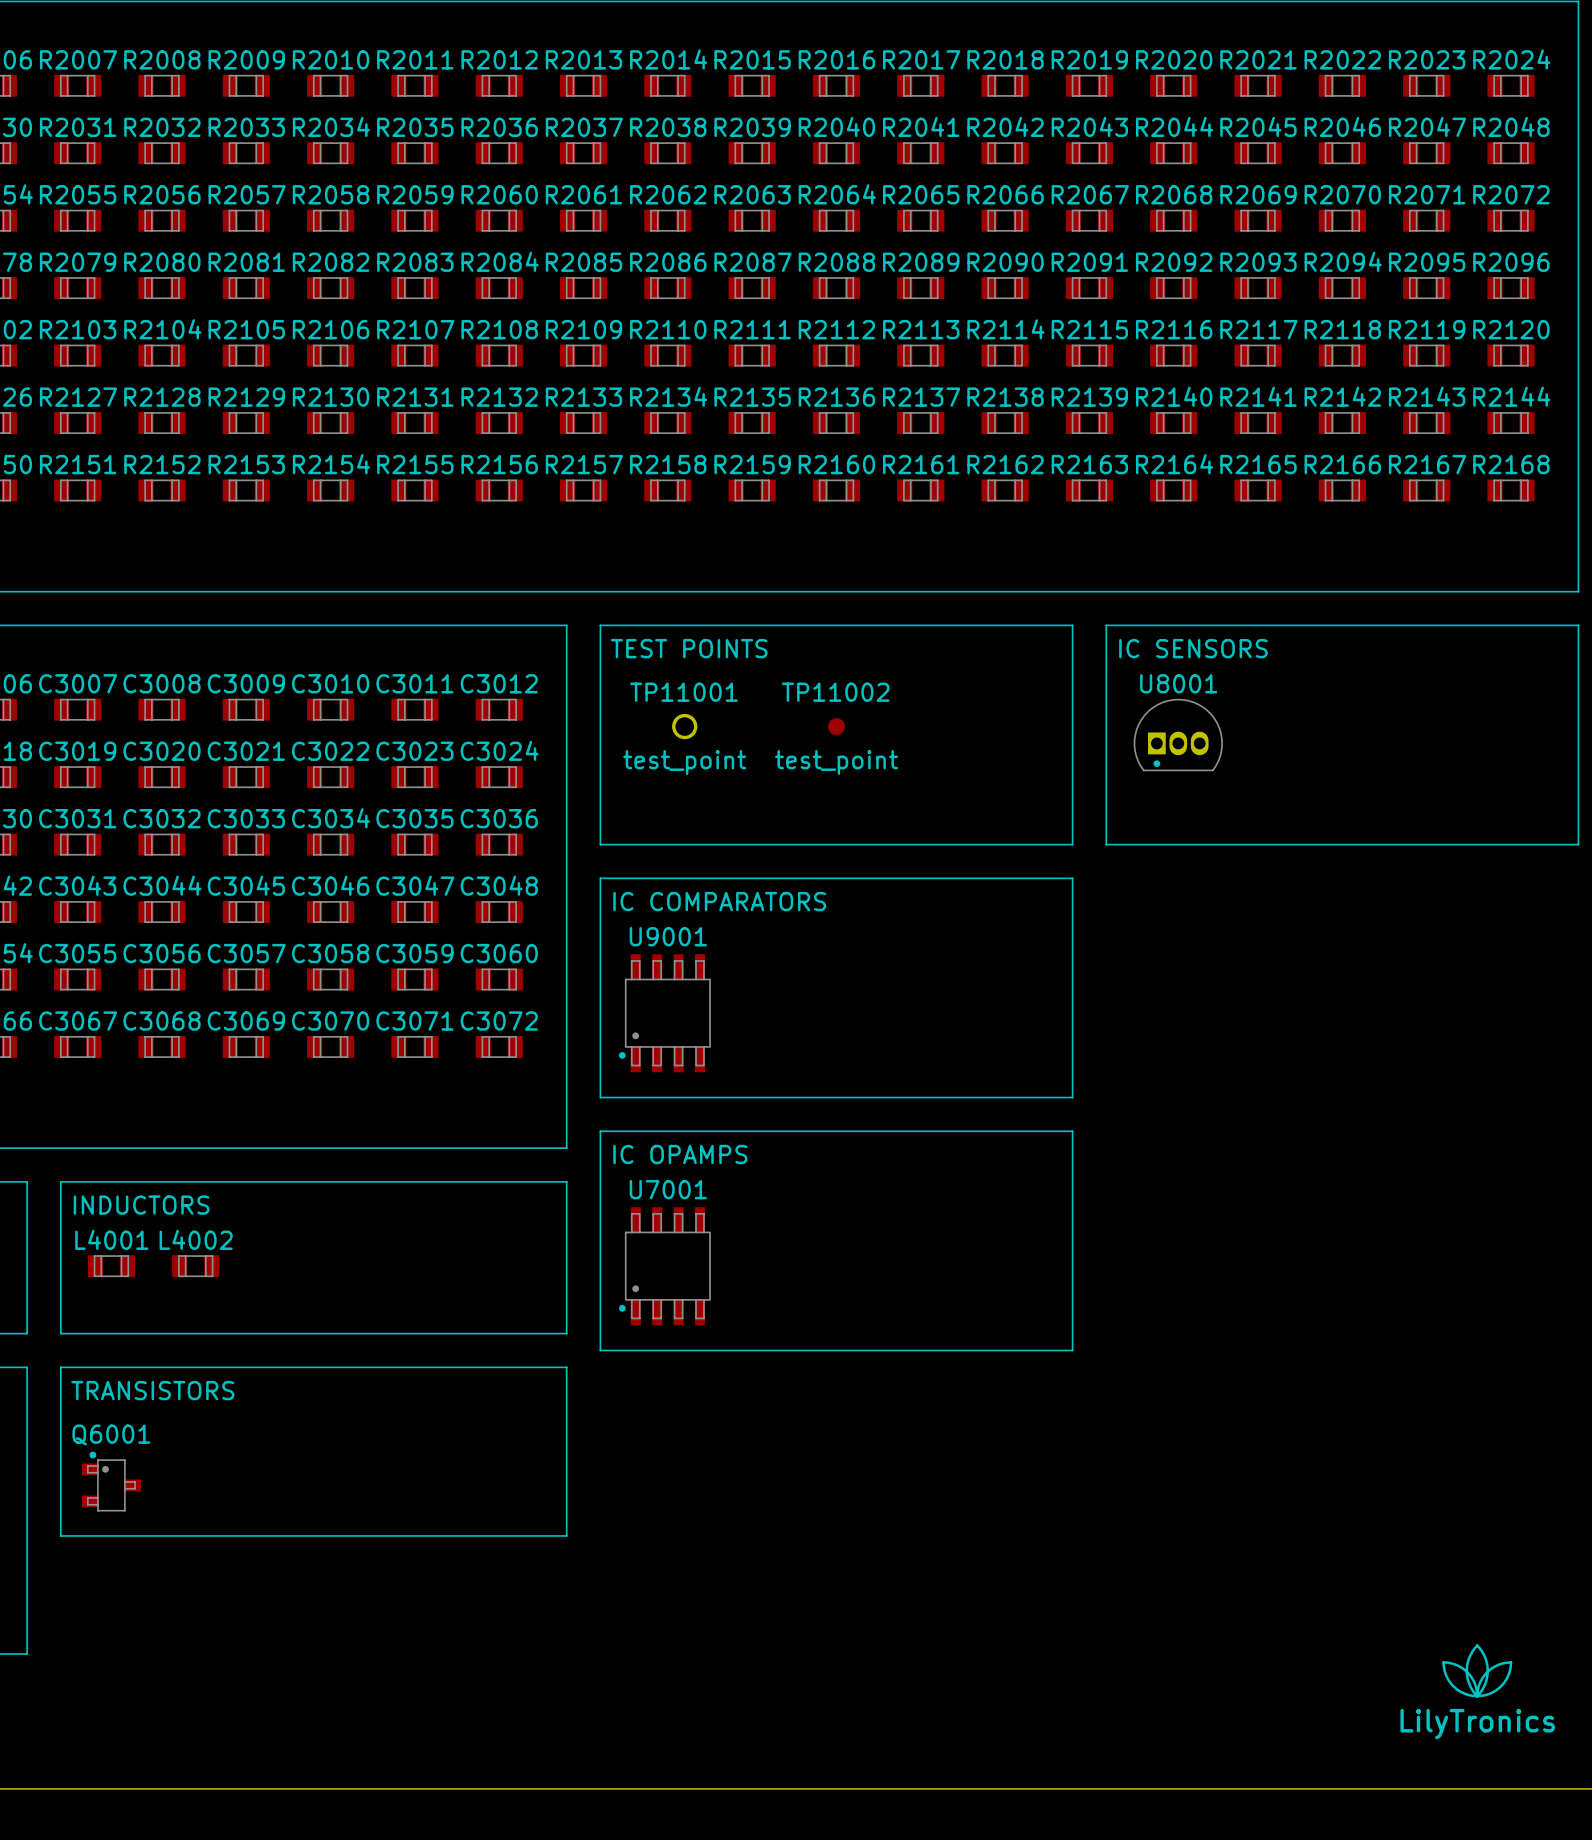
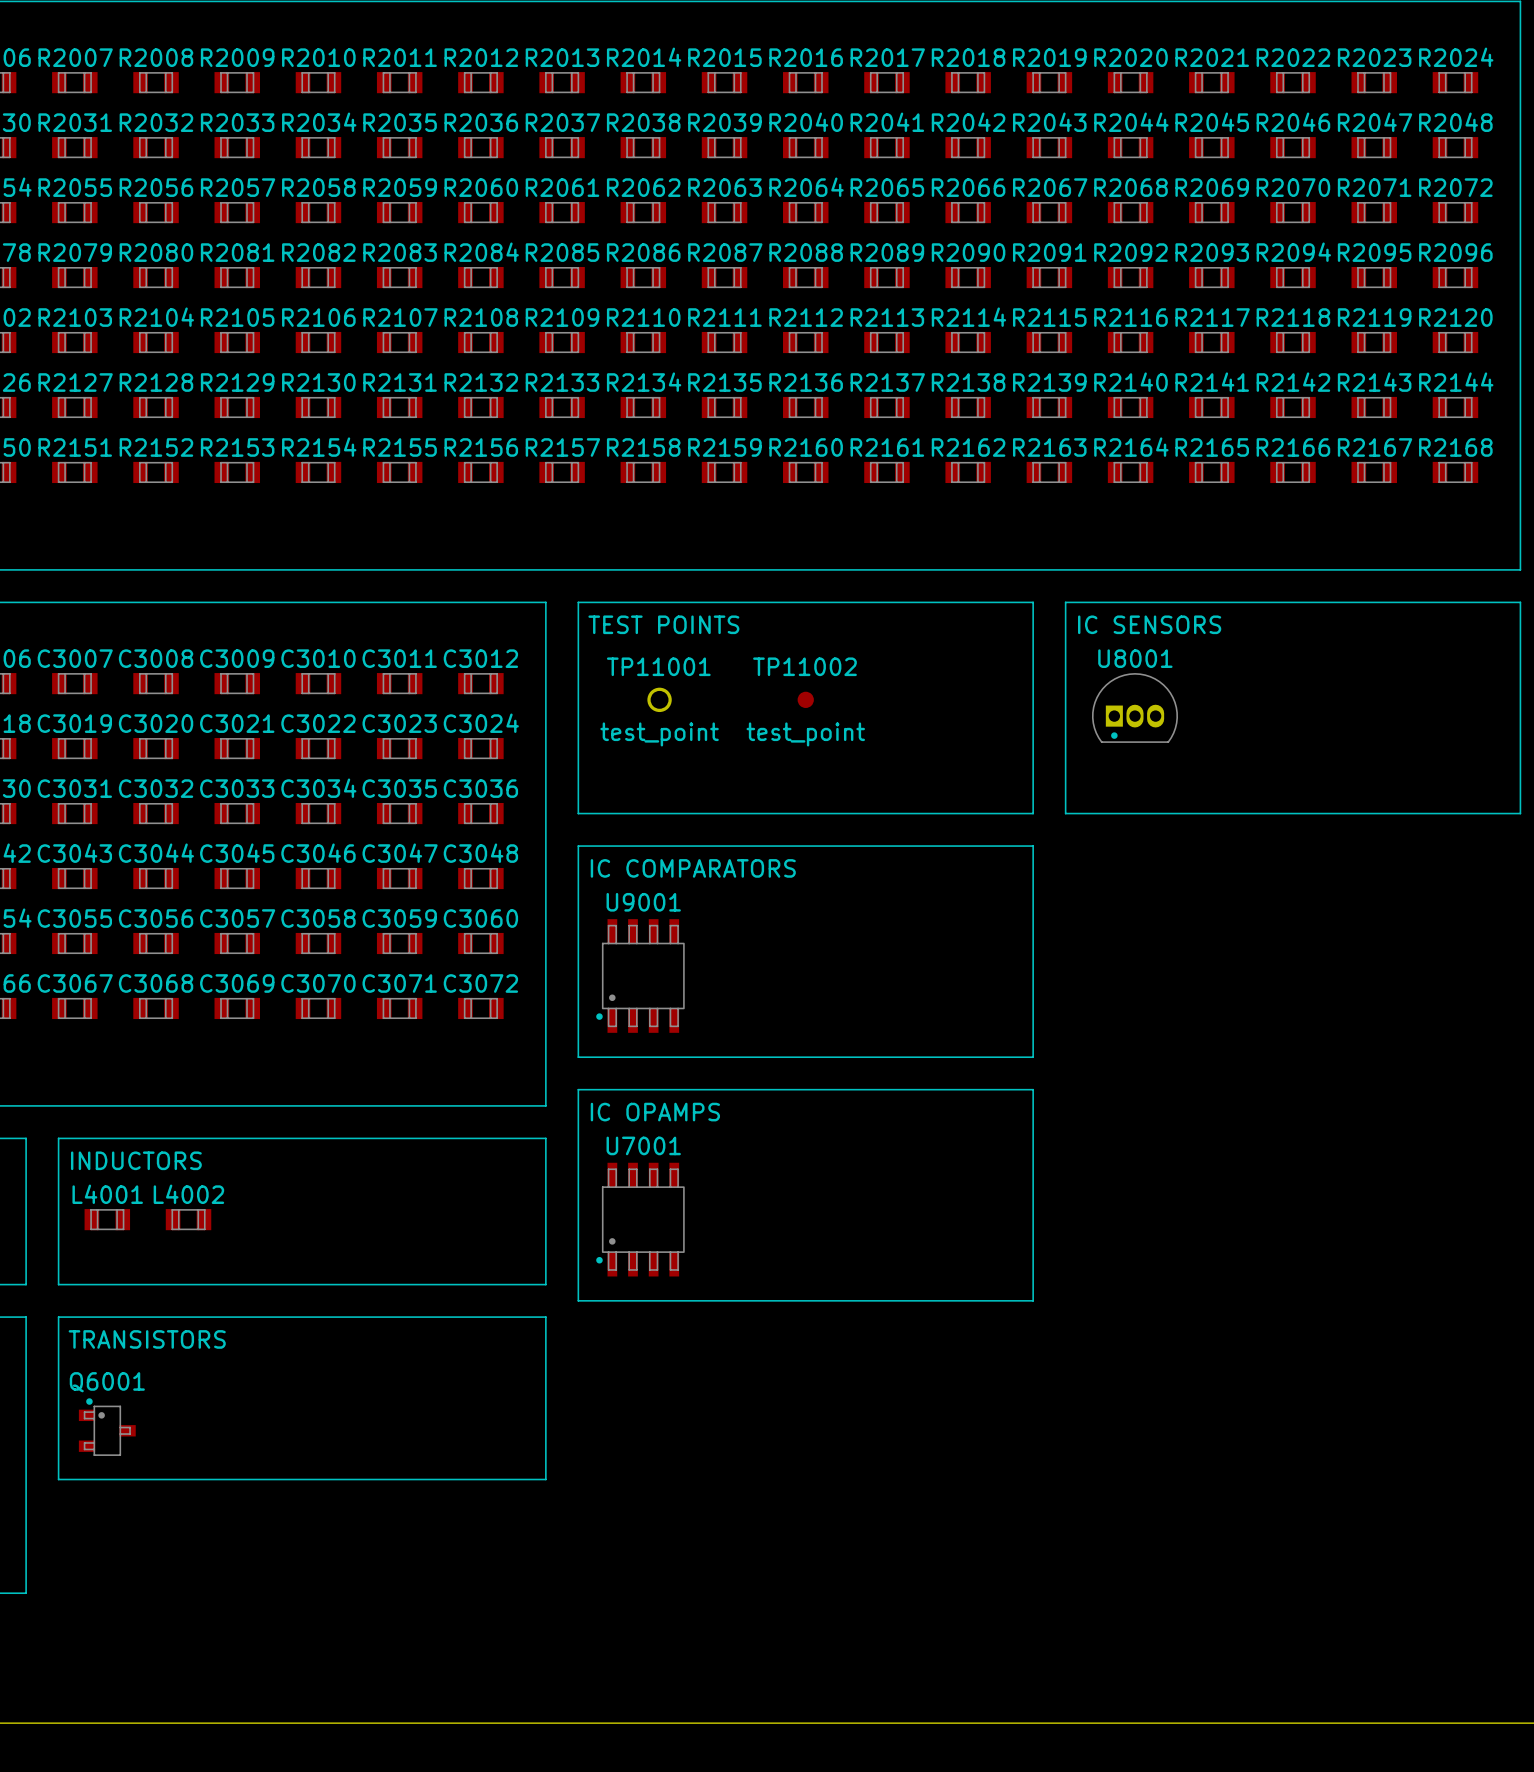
drawing: [1442, 1644, 1513, 1698] -> none

